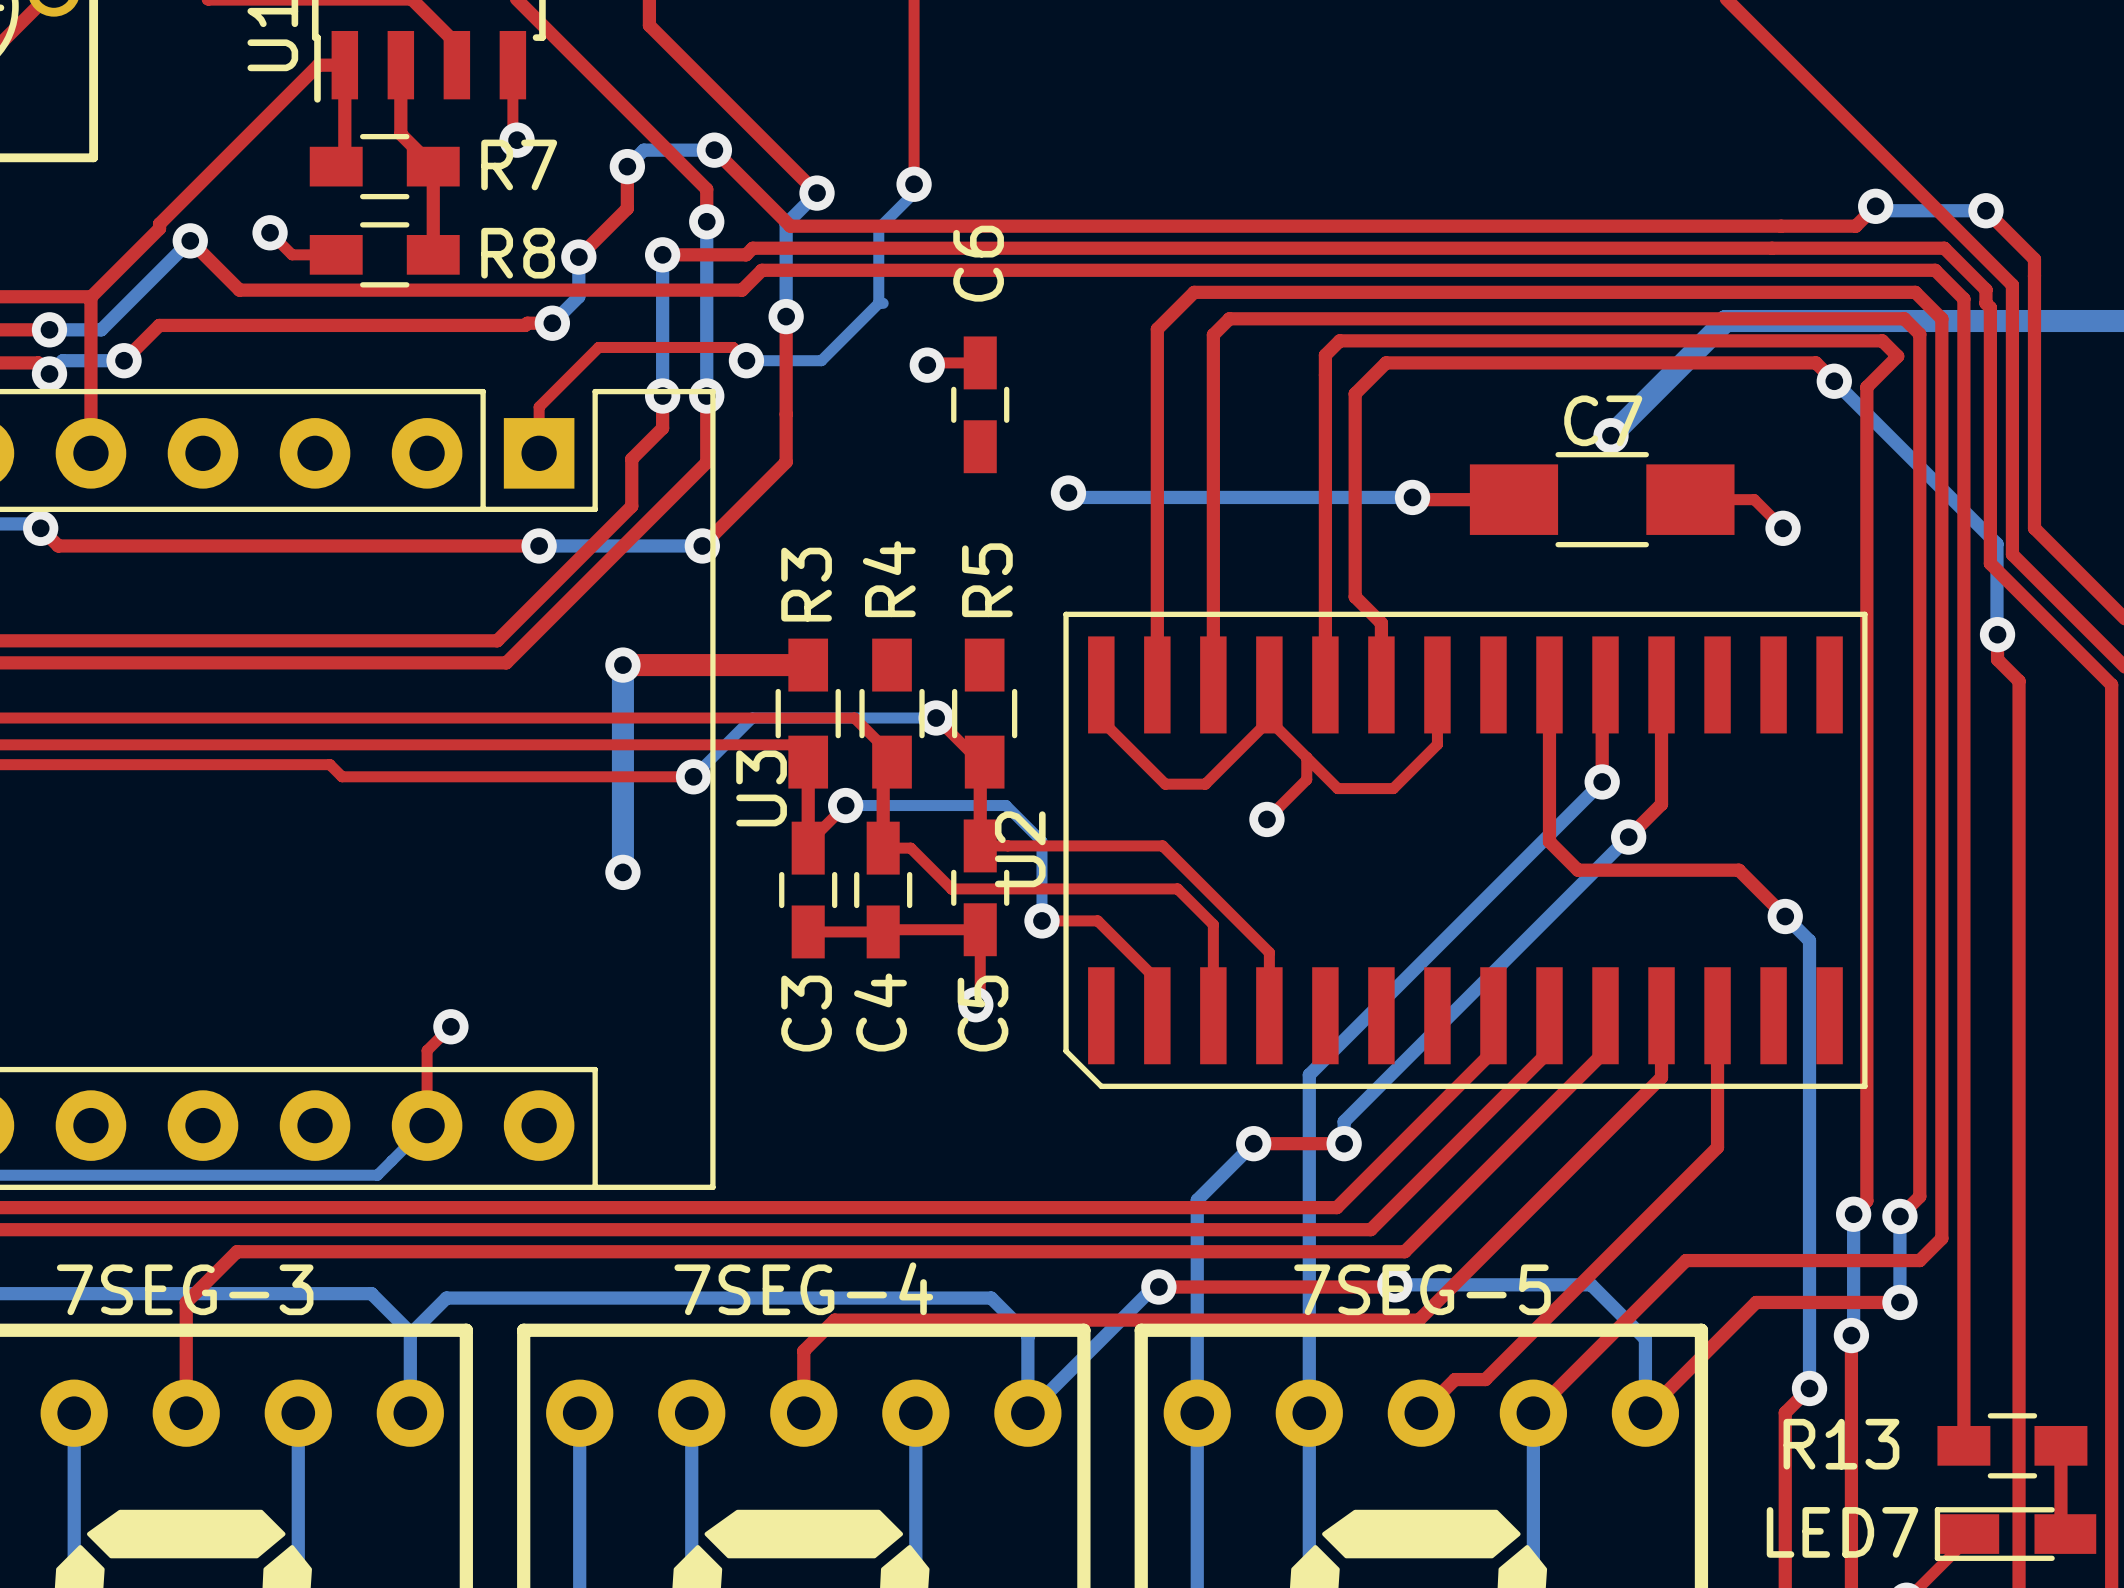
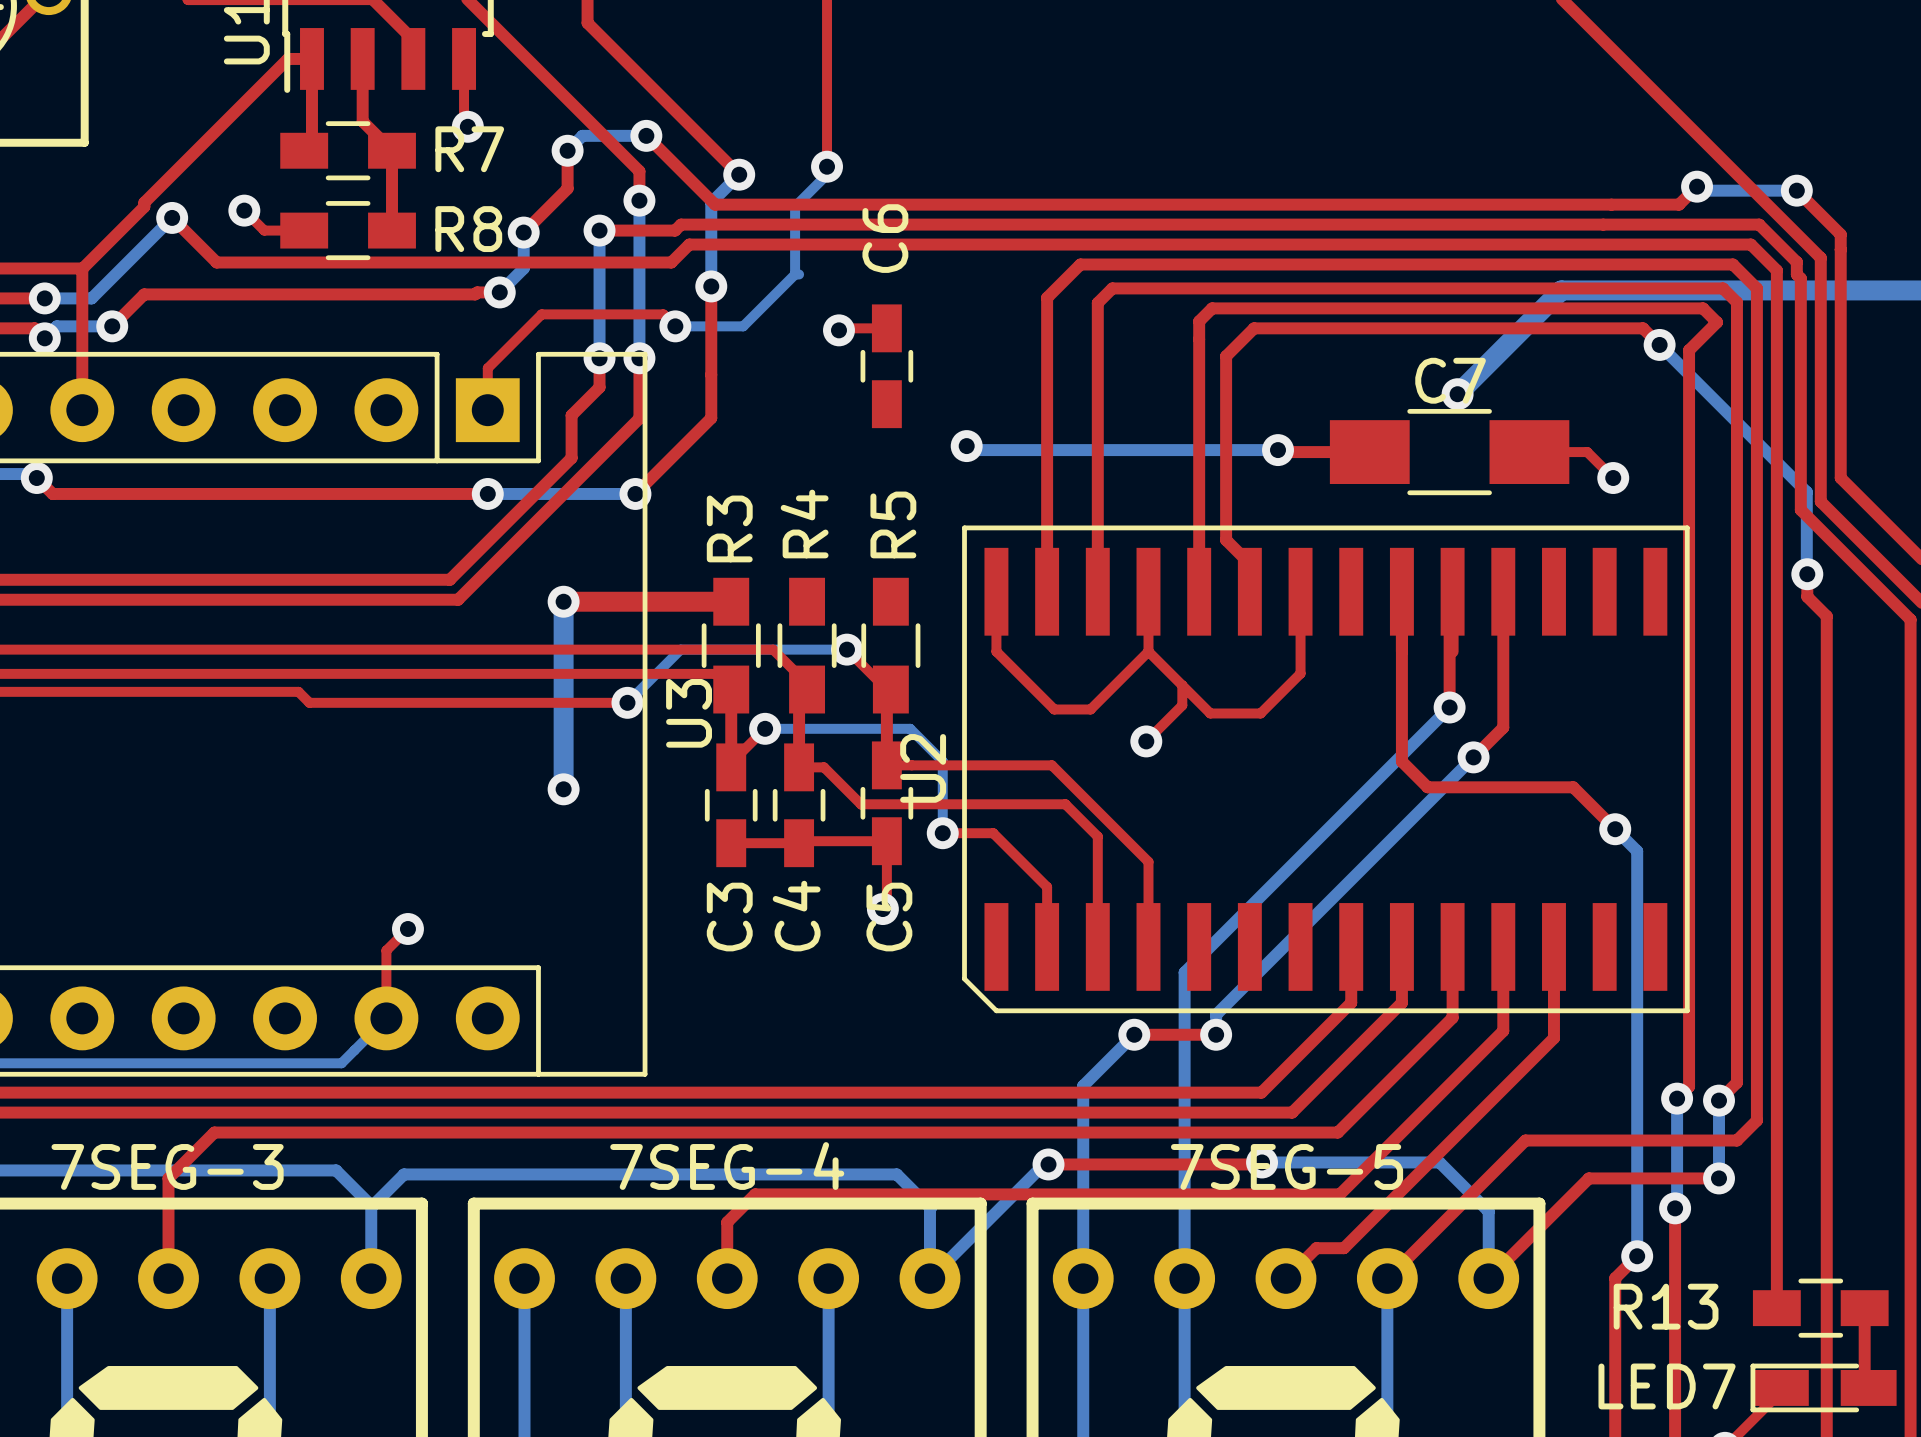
U2 footprint: [1063, 611, 1868, 1089] -> [962, 525, 1690, 1014]
top track: (1493, 1051) (1336, 1207) -> (1351, 950) (1351, 1002) (1261, 1092) (1209, 1092)
top track: (1549, 1051) (1370, 1229) -> (1401, 950) (1401, 1002) (1292, 1112) (1240, 1112)
top track: (1605, 1051) (1404, 1251) -> (1452, 950) (1452, 1017) (1337, 1132) (1271, 1132)
top track: (1661, 1077) (1418, 1320) -> (1503, 974) (1503, 1030) (1339, 1194) (1283, 1194)

